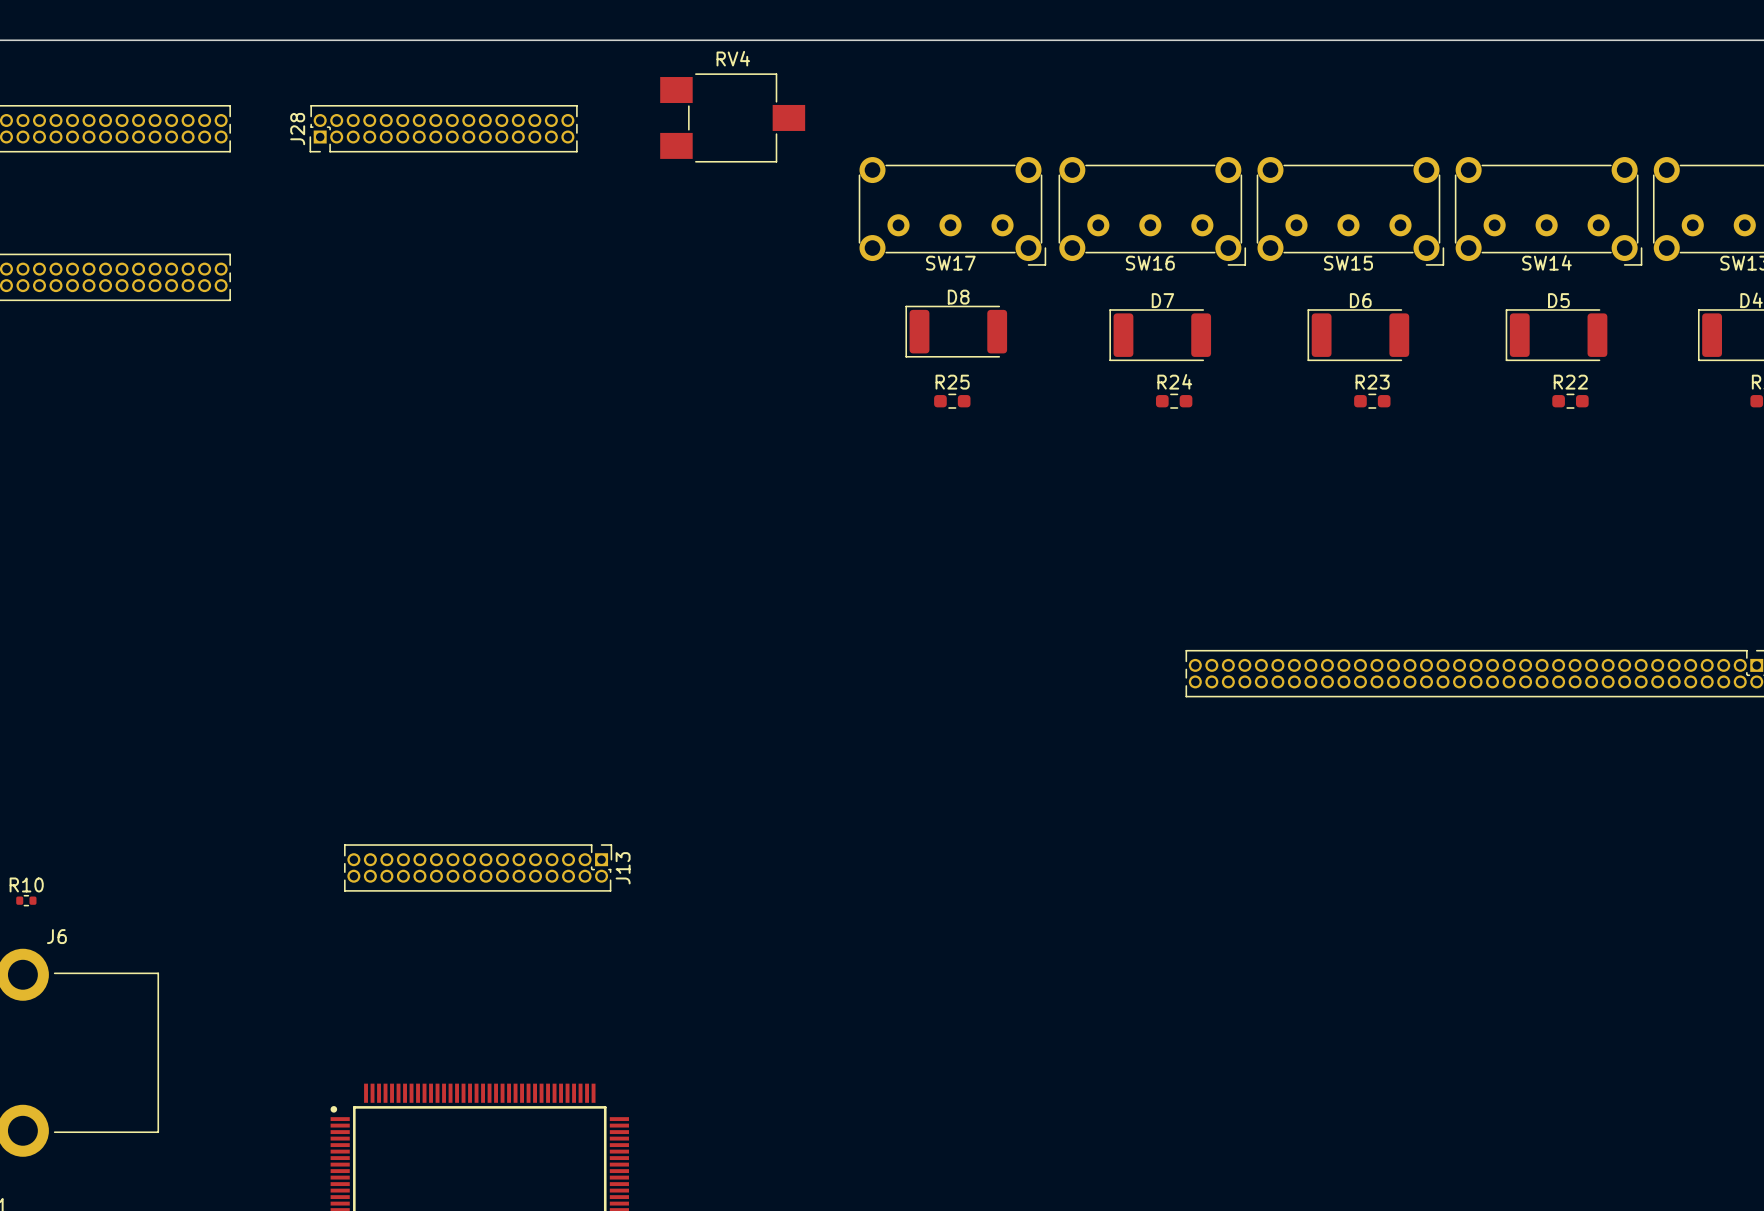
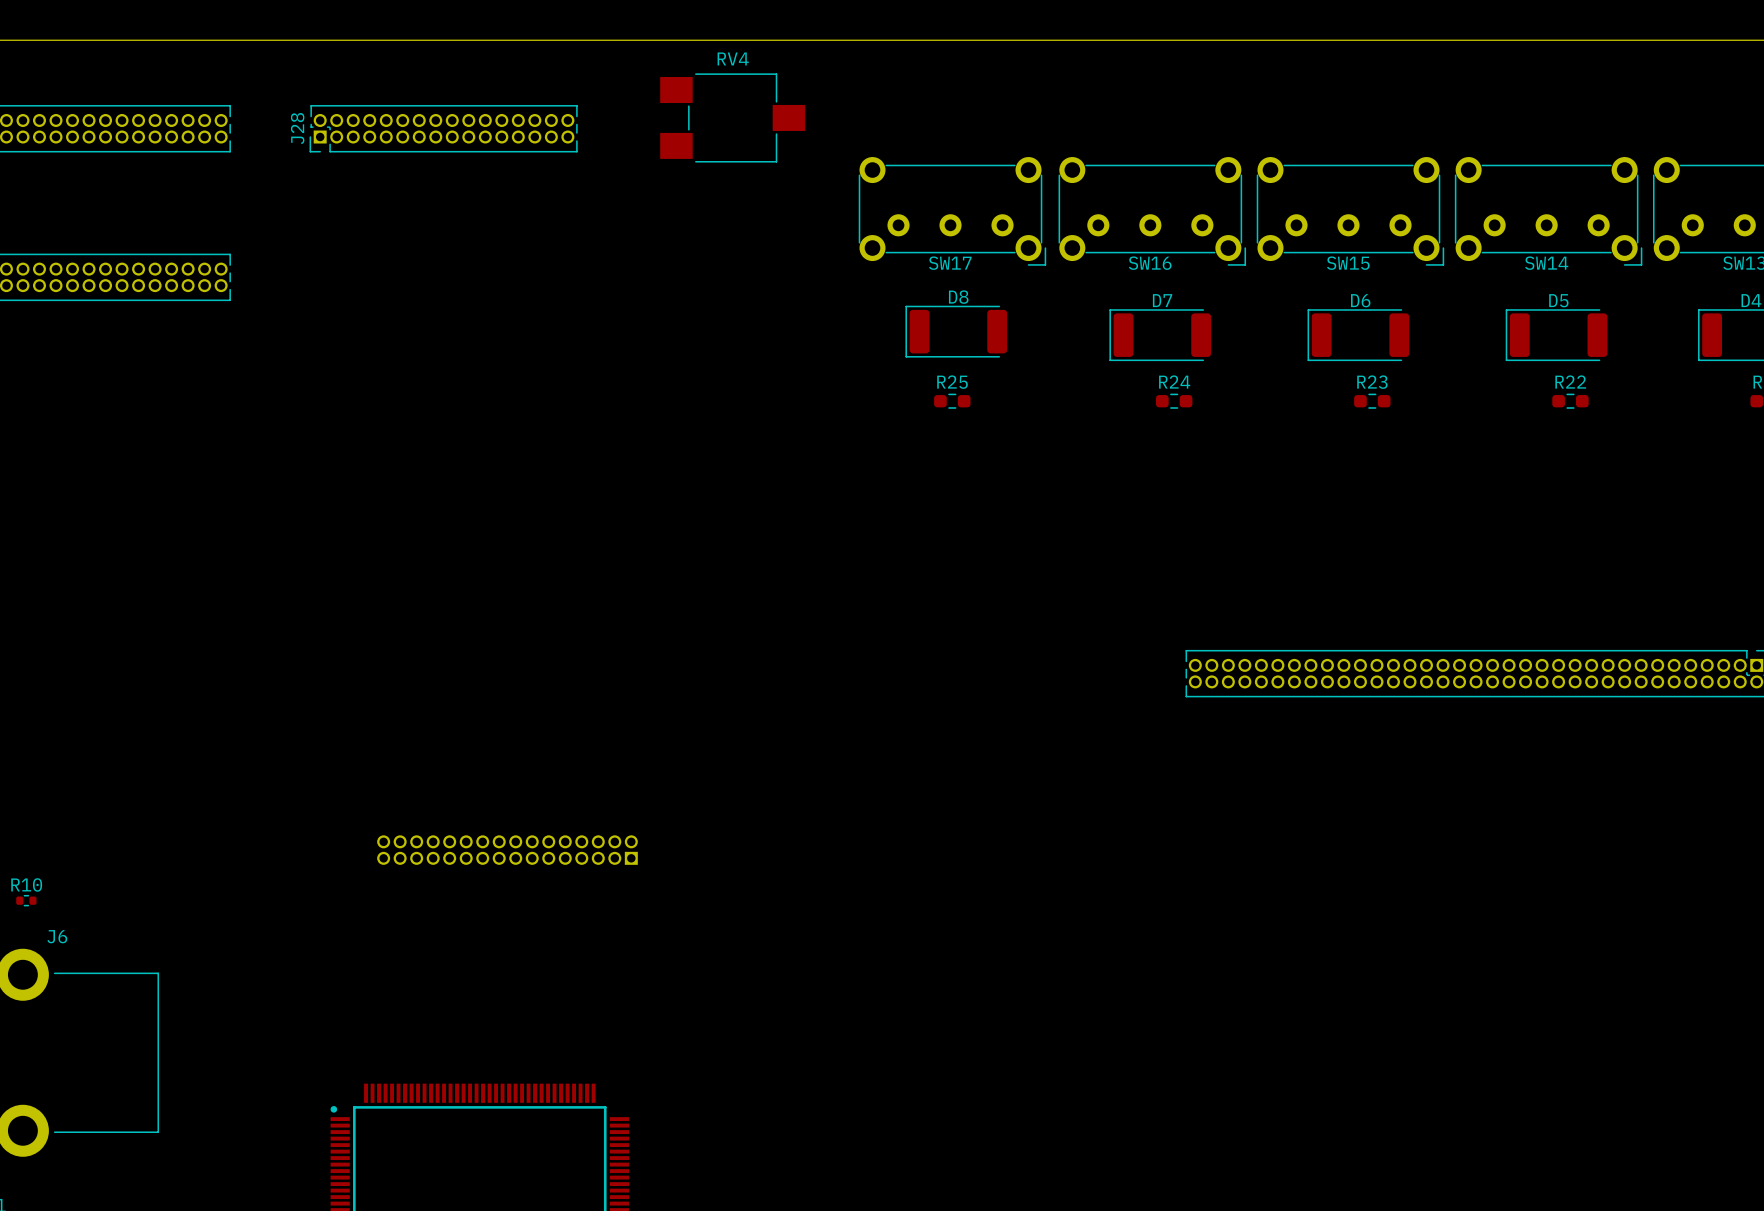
J13 side: top (478, 867) -> bottom (507, 850)

